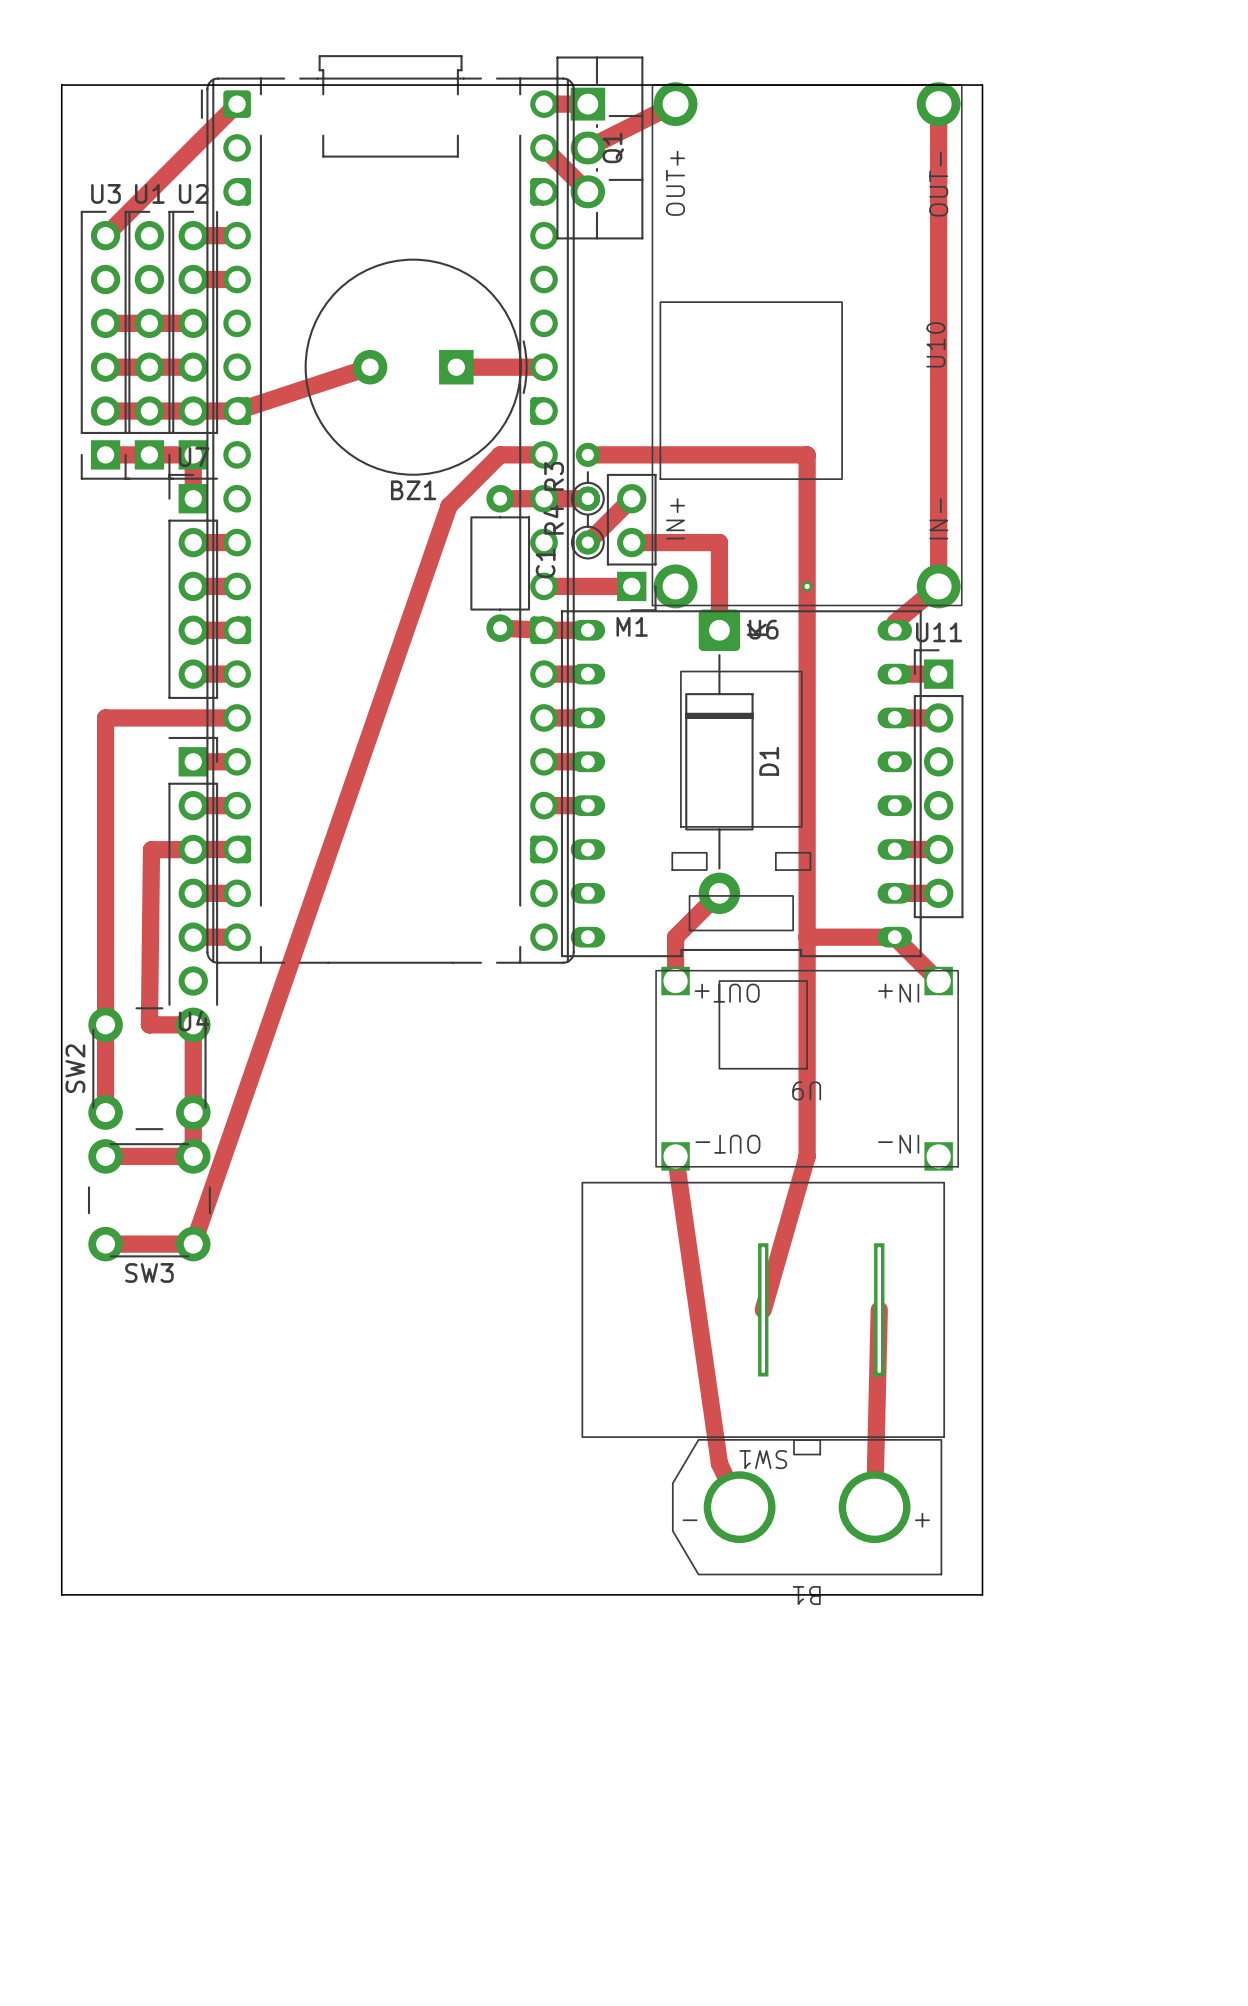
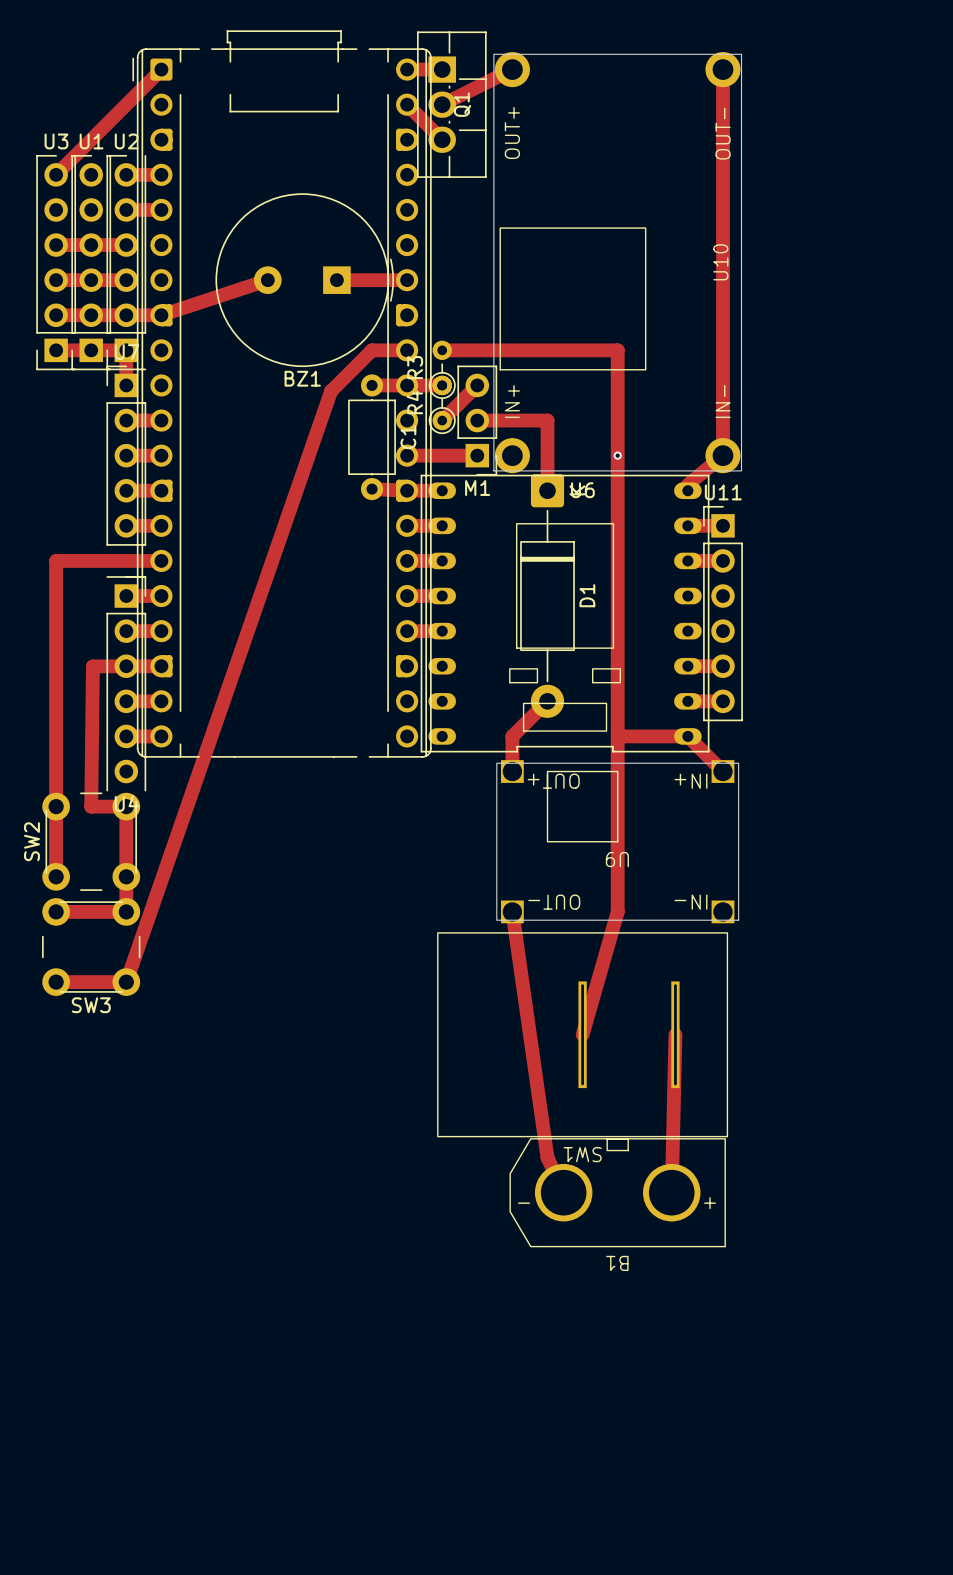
U10 footprint: [652, 82, 963, 609] -> [493, 52, 742, 474]
board edge: (61, 85) (982, 85) (982, 1594) (61, 1594) (61, 85) -> none
U9 footprint: [655, 966, 959, 1171] -> [496, 760, 739, 924]

